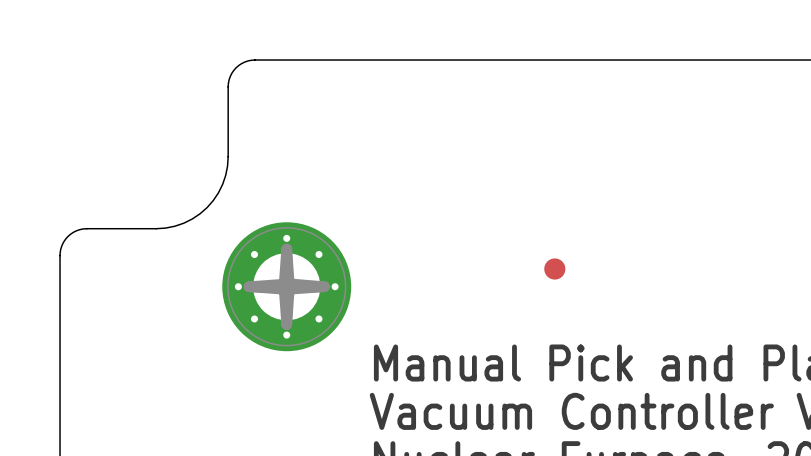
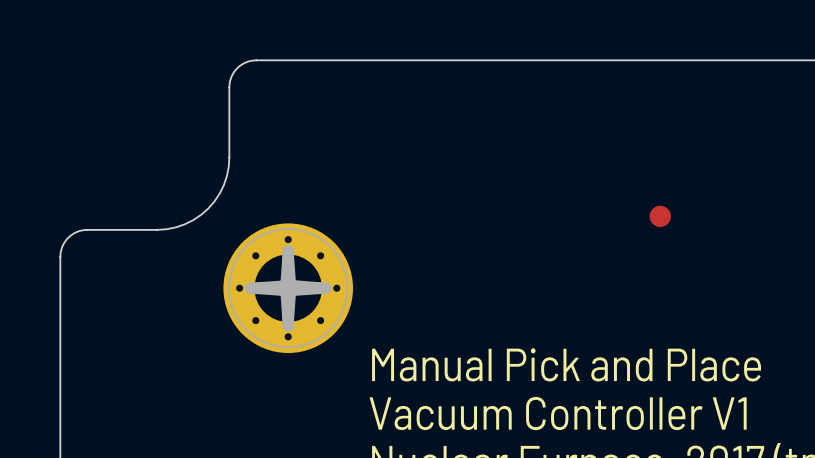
part position: (554, 269) -> (660, 216)

